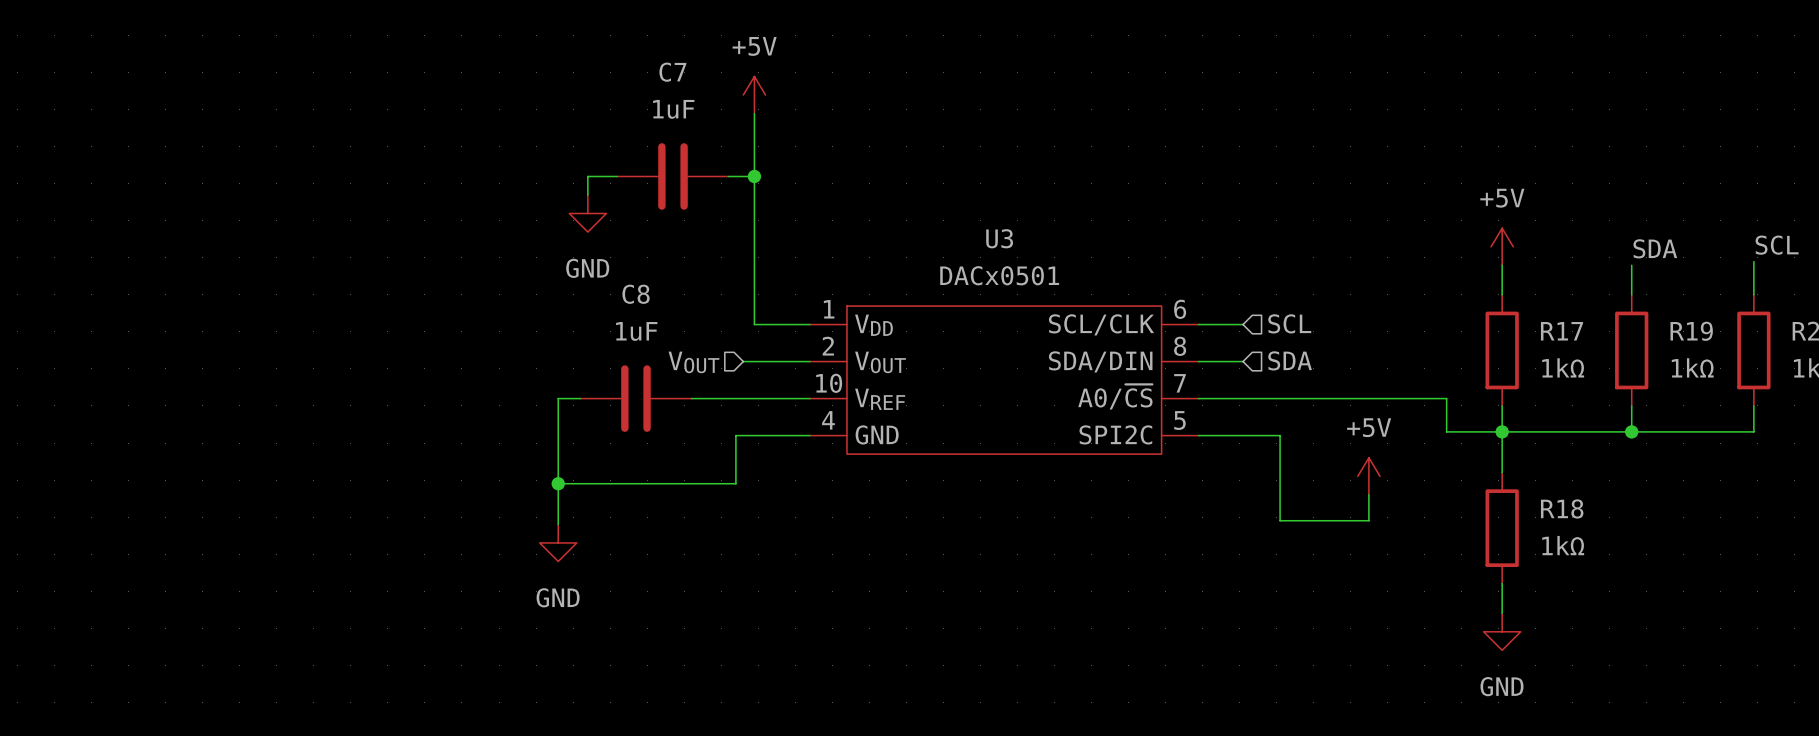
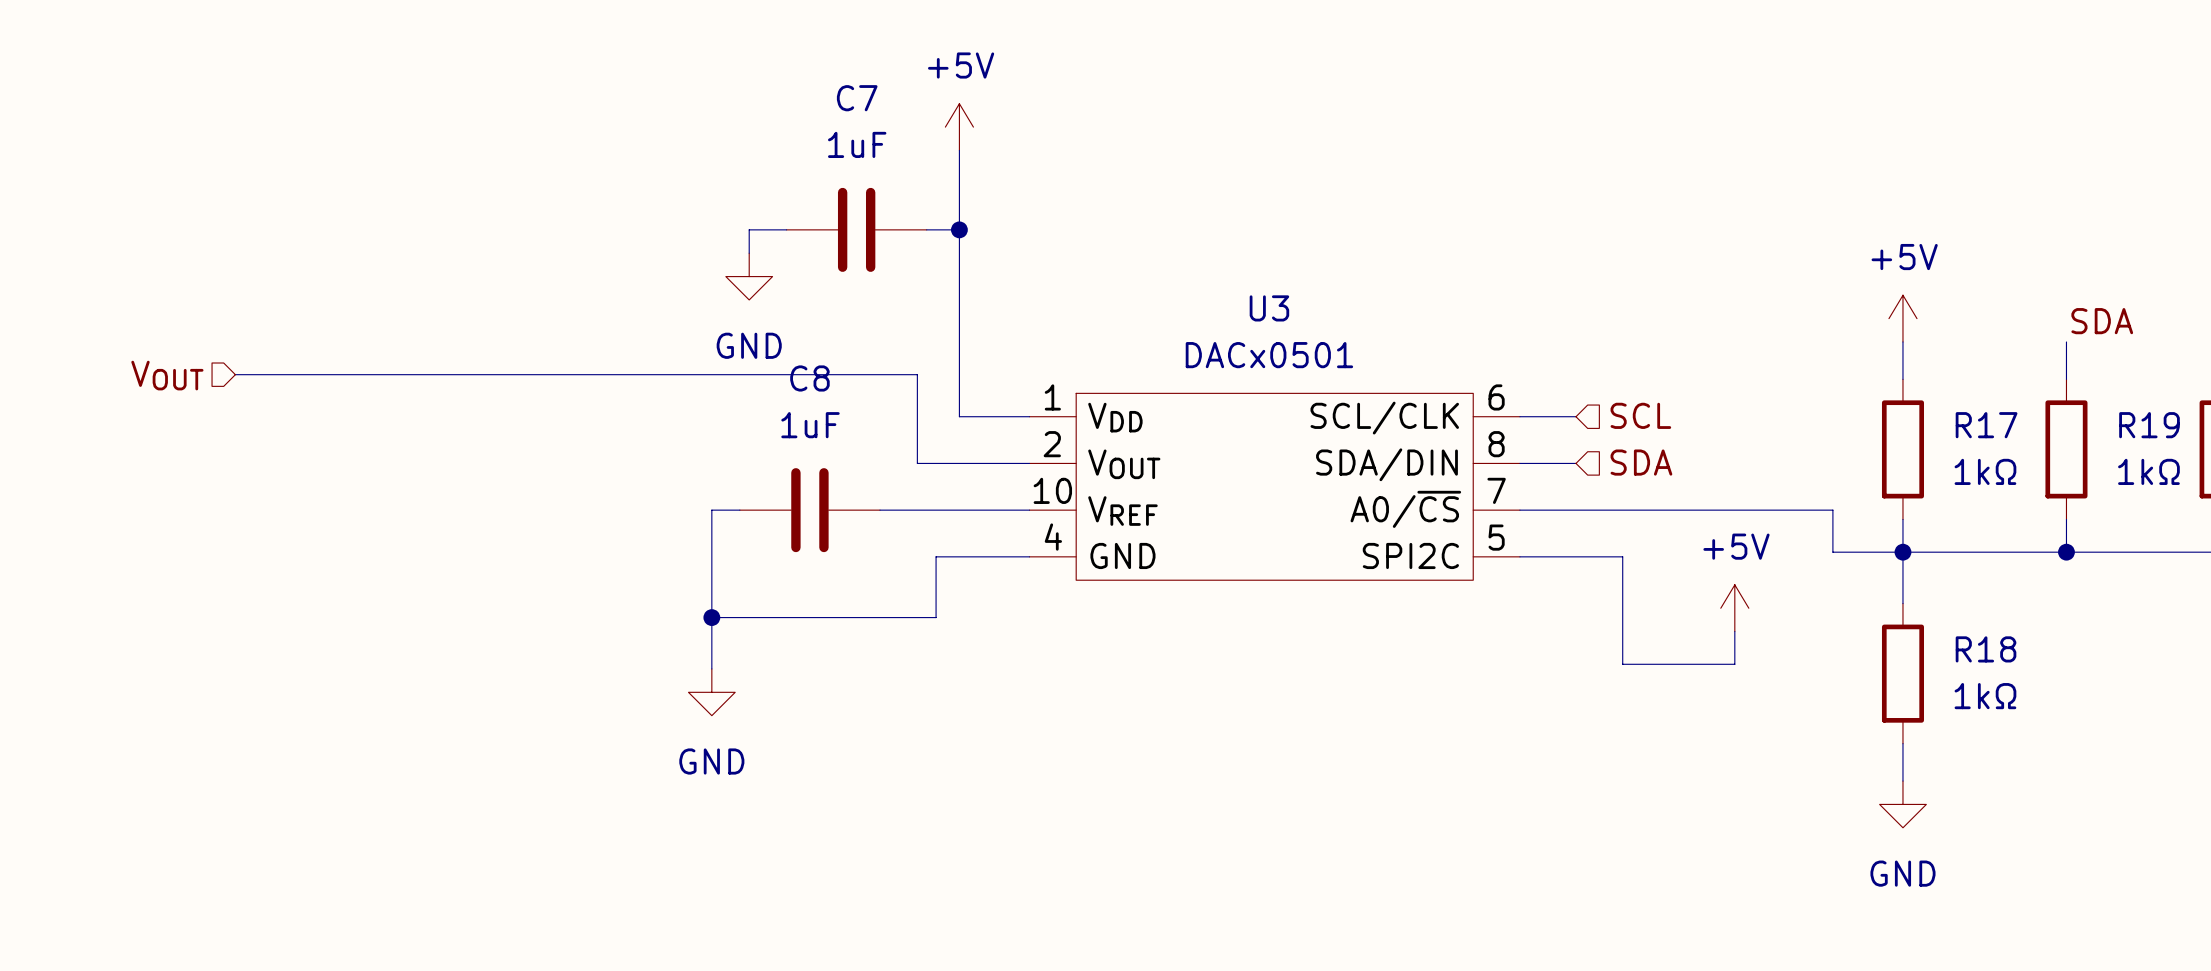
wire: none -> (235, 374) (917, 374) (917, 463) (945, 463)
hierarchical label: none -> VOUT (167, 375)
hierarchical label: VOUT (693, 362) -> none

